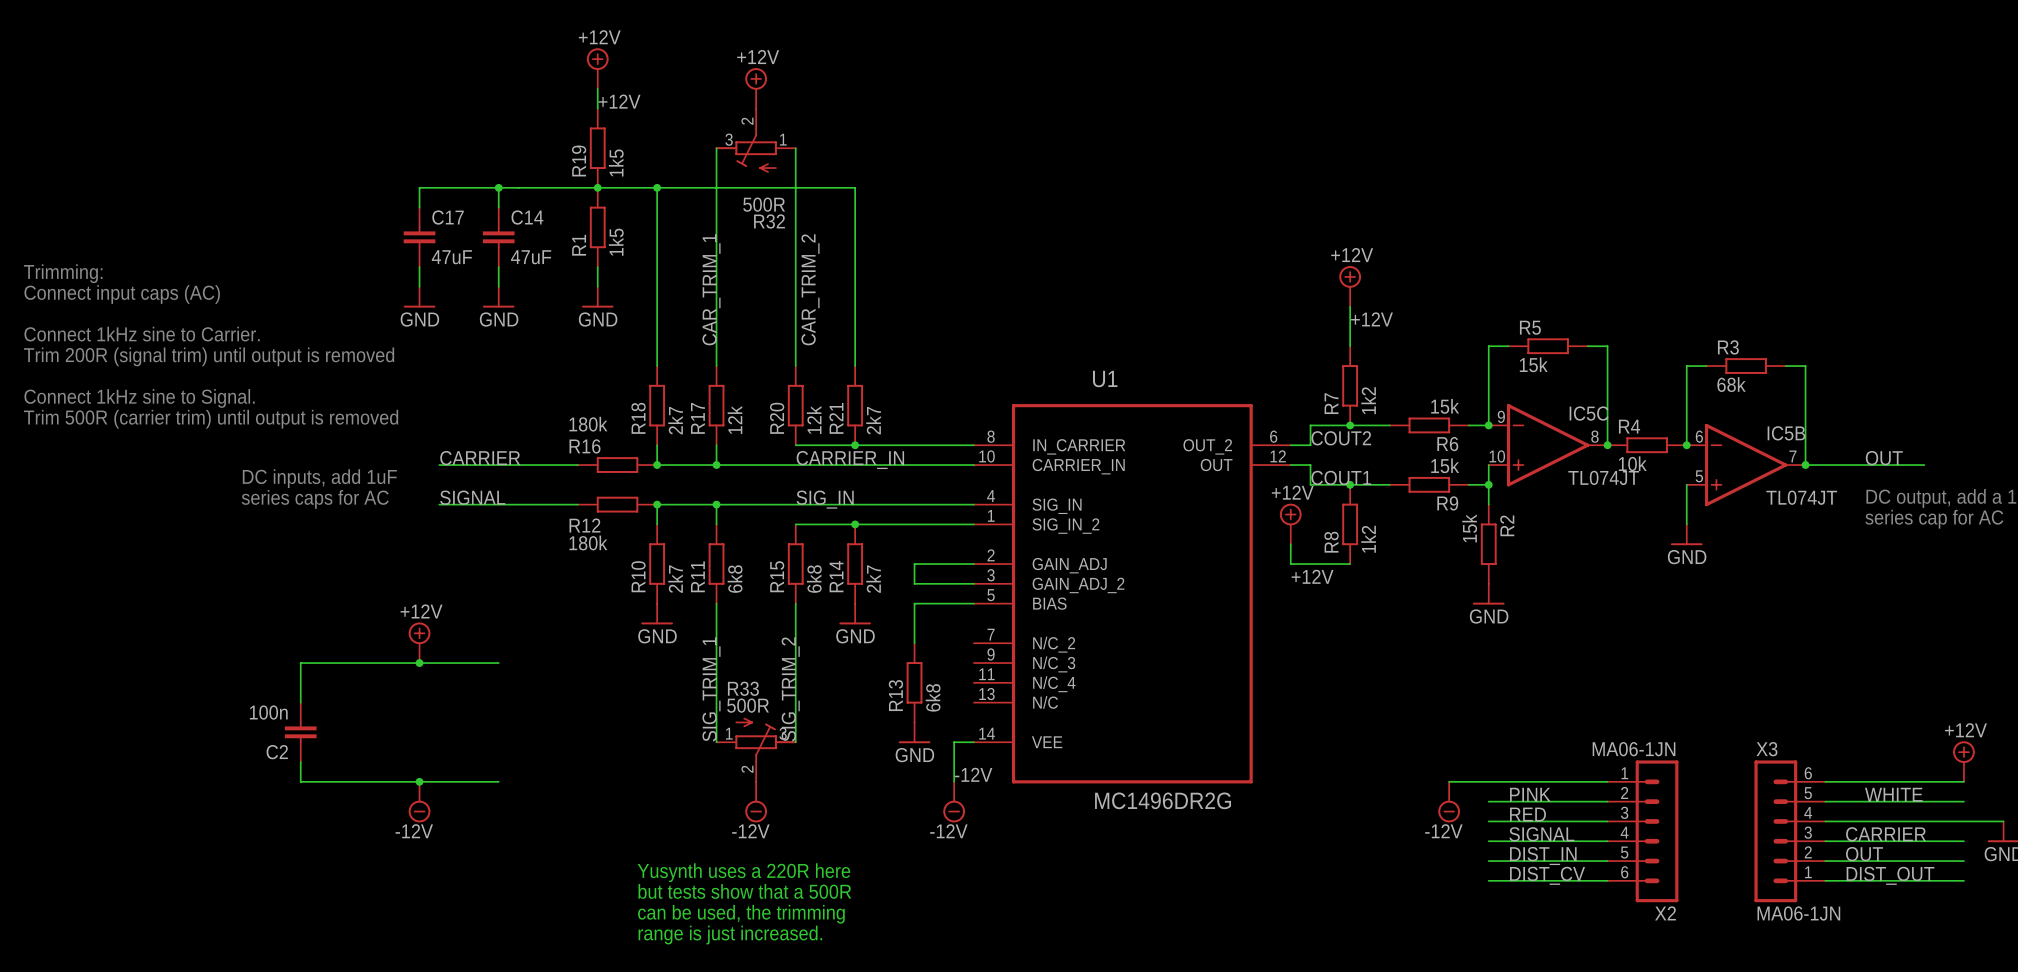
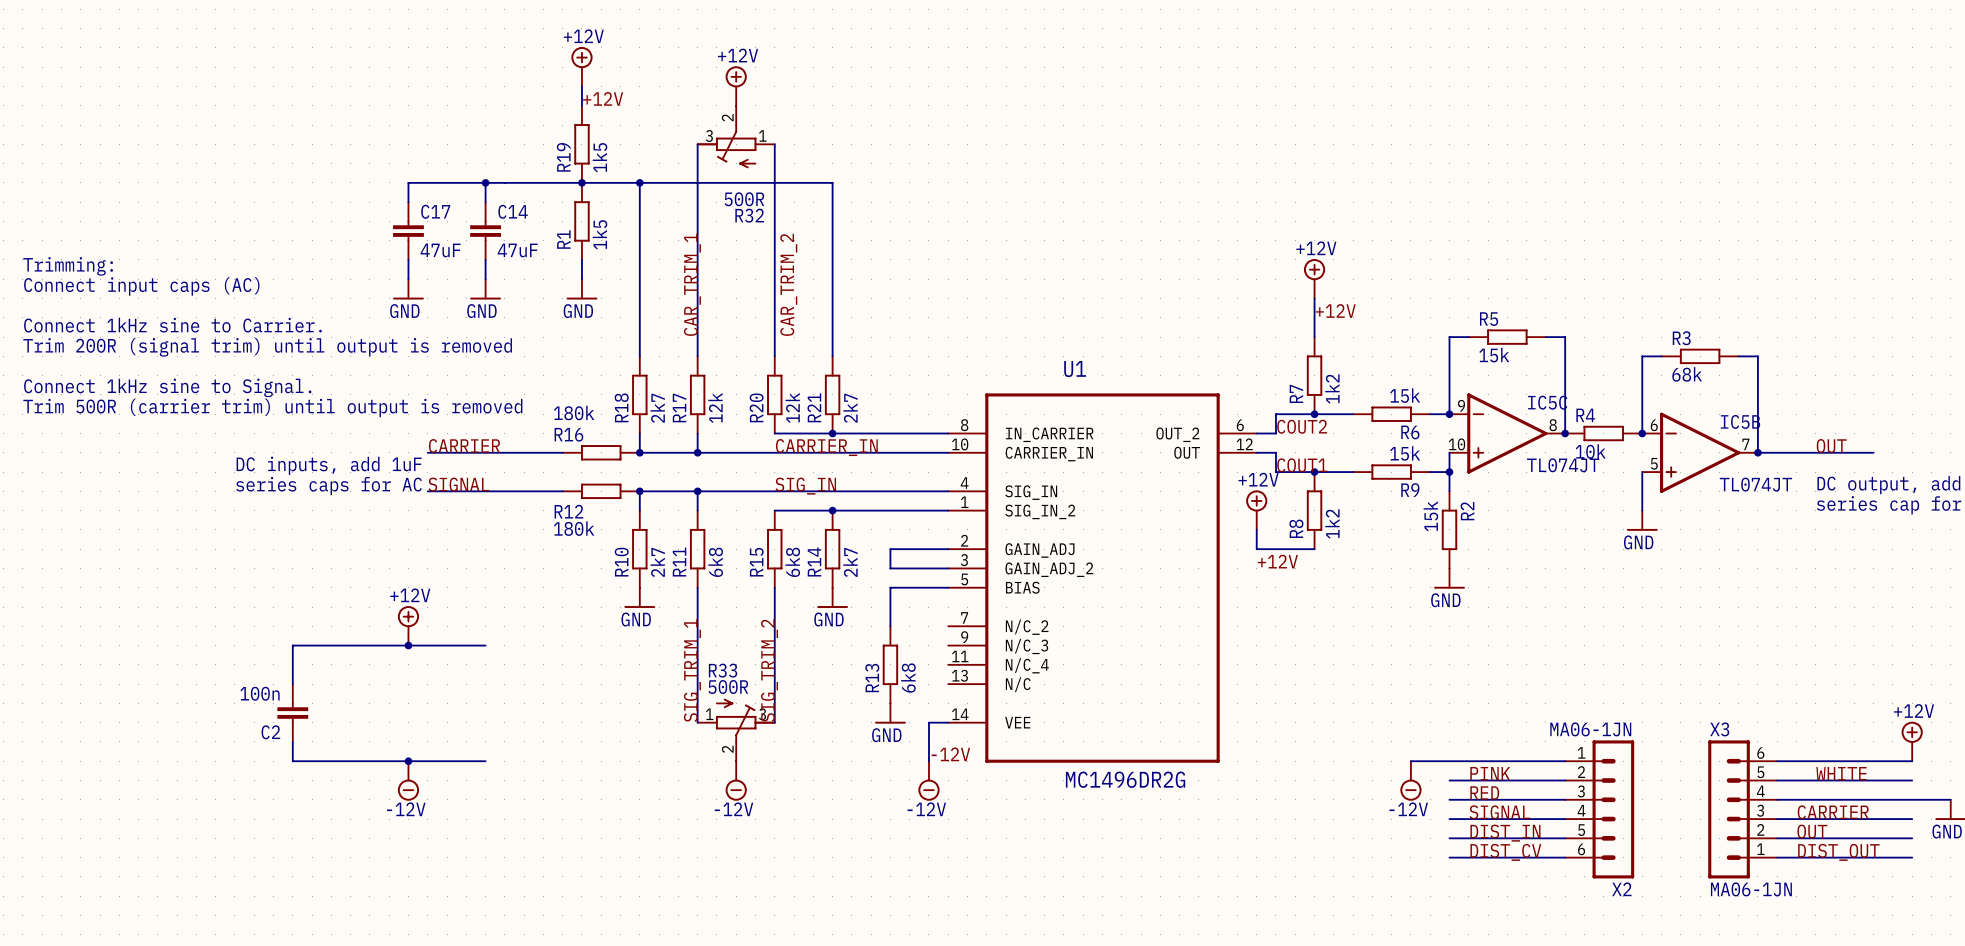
text: Yusynth uses a 220R here (743, 872) -> none
text: but tests show that a 500R (744, 891) -> none
text: can be used, the trimming (741, 914) -> none
text: range is just increased. (730, 935) -> none

